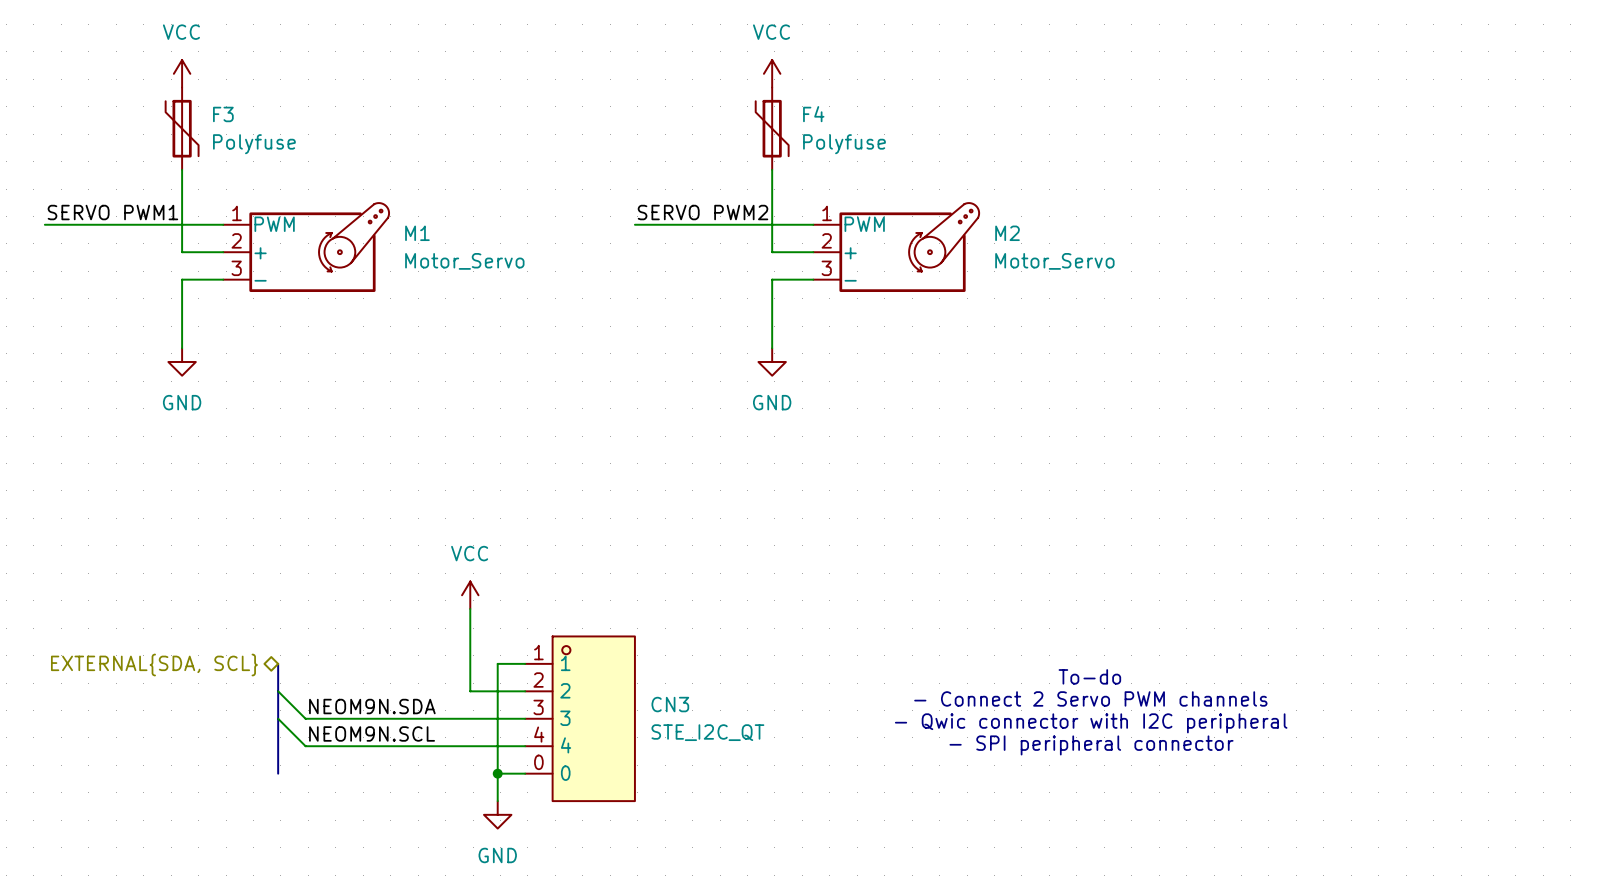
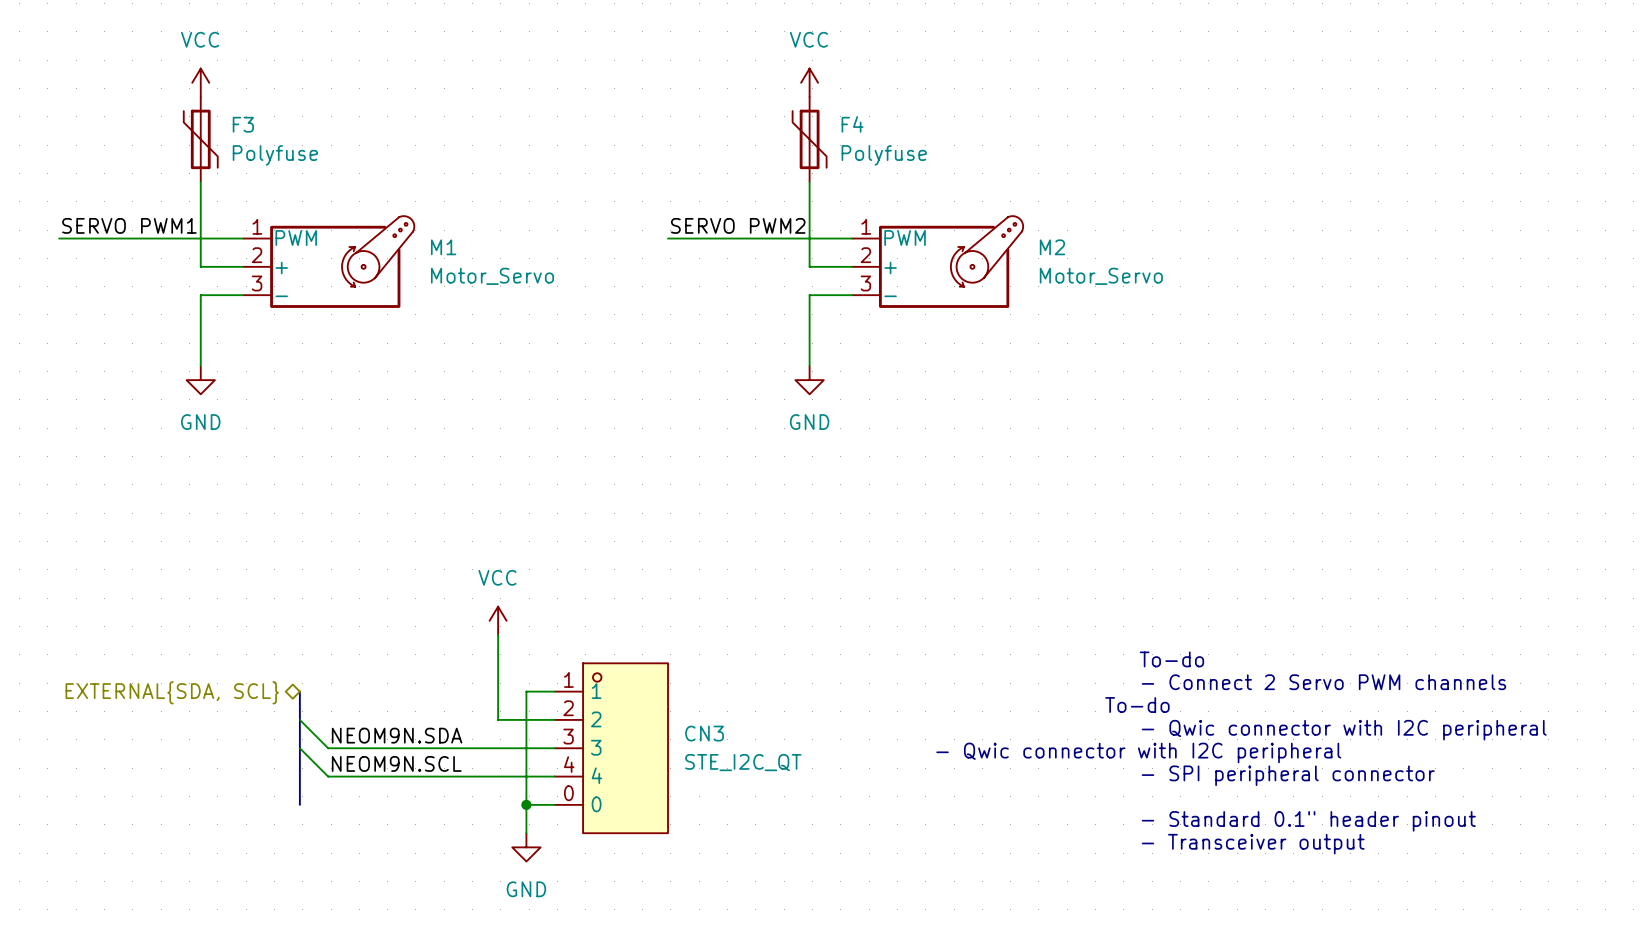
text: none -> To-do (1171, 659)
text: none -> - Connect 2 Servo PWM channels (1323, 682)
text: - Connect 2 Servo PWM channels (1090, 698) -> - Qwic connector with I2C peripheral (1344, 730)
text position: - SPI peripheral connector (1091, 745) -> - SPI peripheral connector (1288, 775)
text: none -> - Standard 0.1" header pinout (1308, 821)
text: none -> - Transceiver output (1253, 844)

